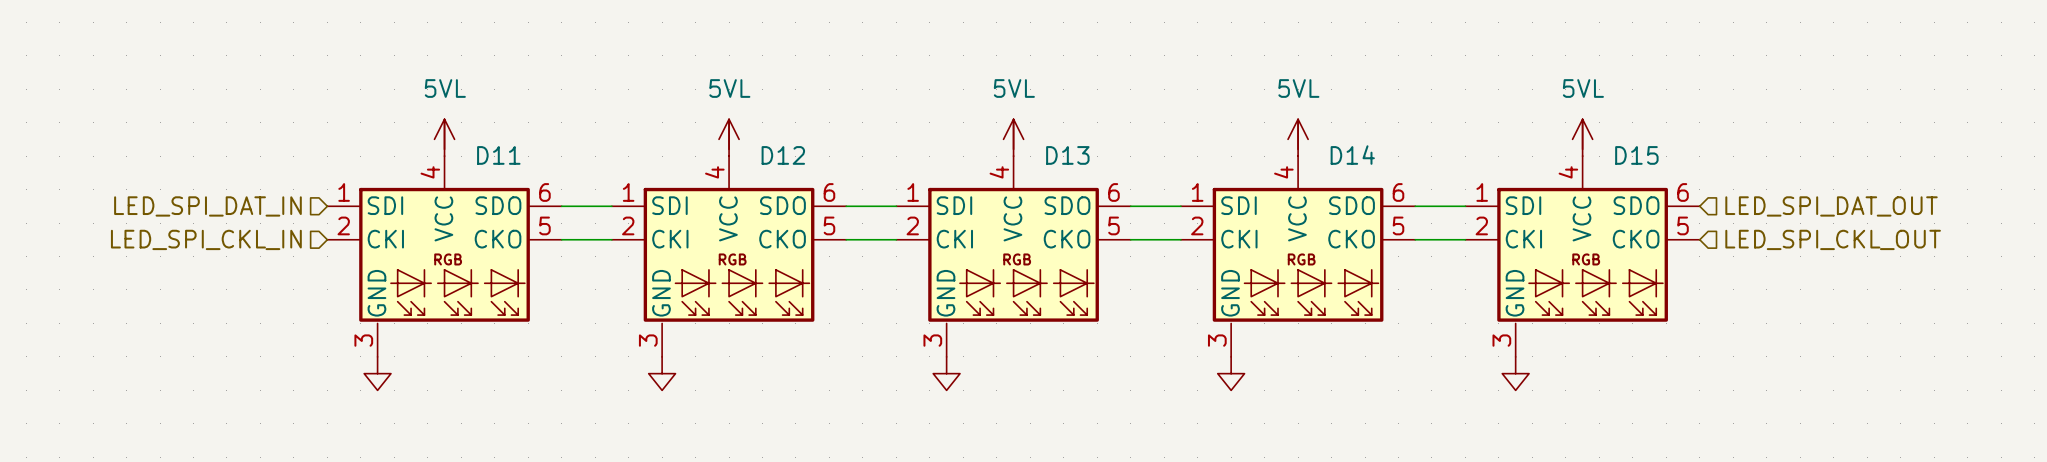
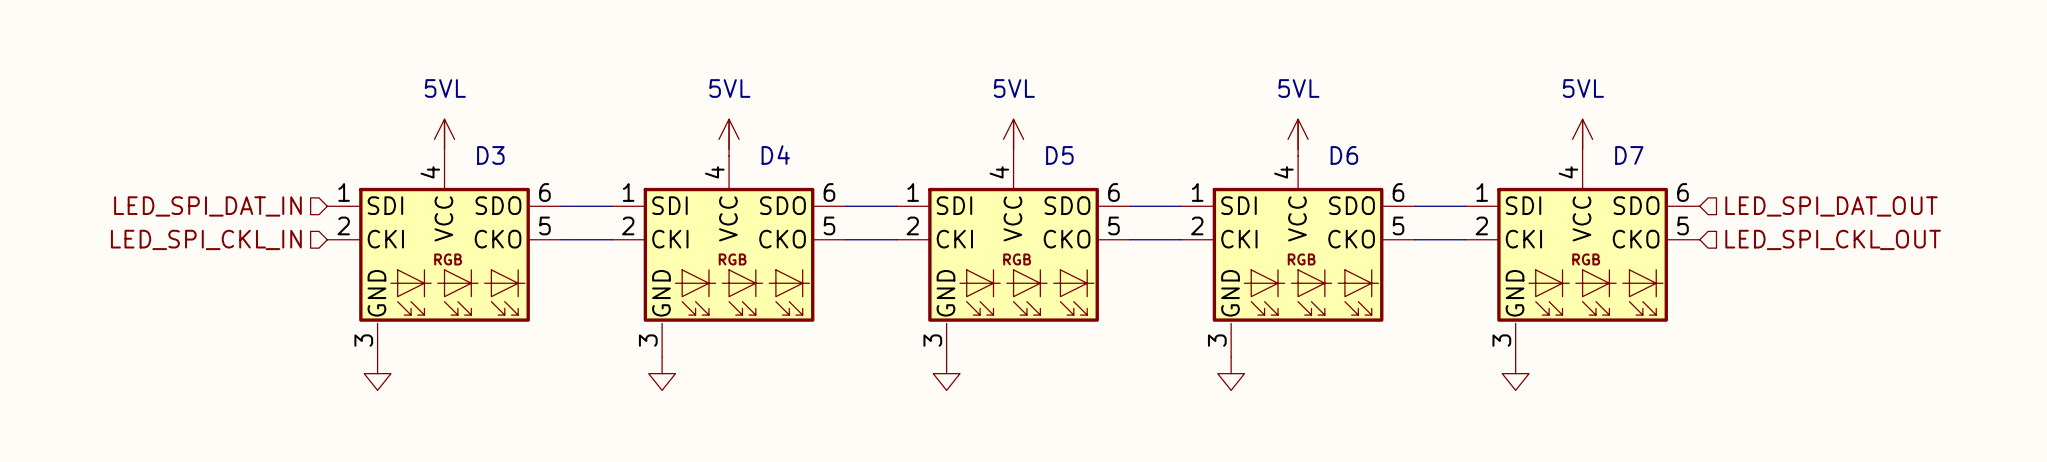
D11 name: D11 (498, 155) -> D3 (490, 155)
D12 name: D12 (783, 155) -> D4 (775, 155)
D13 name: D13 (1067, 155) -> D5 (1059, 155)
D14 name: D14 (1352, 155) -> D6 (1344, 155)
D15 name: D15 (1636, 155) -> D7 (1629, 155)

